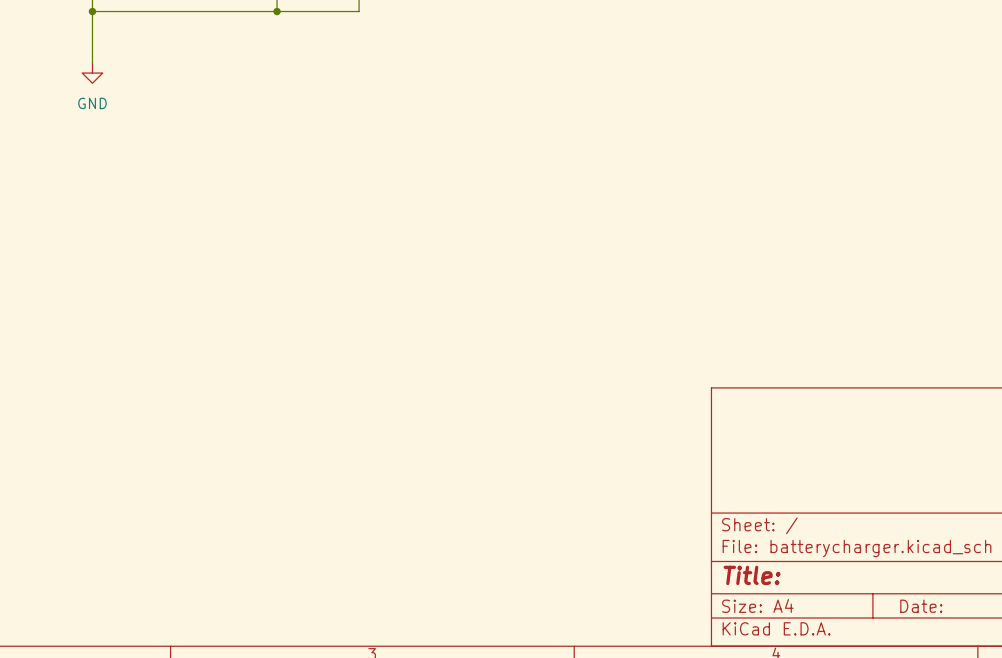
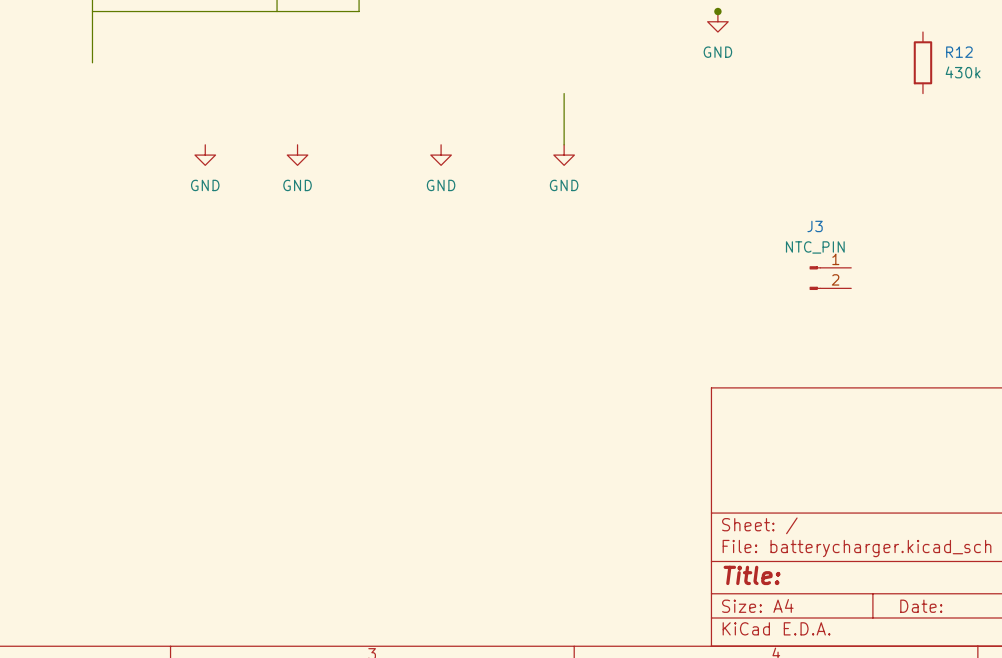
junction: (92, 11) -> none
junction: (277, 11) -> none
junction: none -> (717, 11)
power symbol: none -> GND (717, 21)
R12: none -> 430k (922, 62)
power symbol: GND (92, 73) -> none
wire: none -> (564, 93) (564, 144)
power symbol: none -> GND (205, 155)
power symbol: none -> GND (297, 155)
power symbol: none -> GND (441, 155)
power symbol: none -> GND (564, 155)
J3: none -> NTC_PIN (830, 278)

